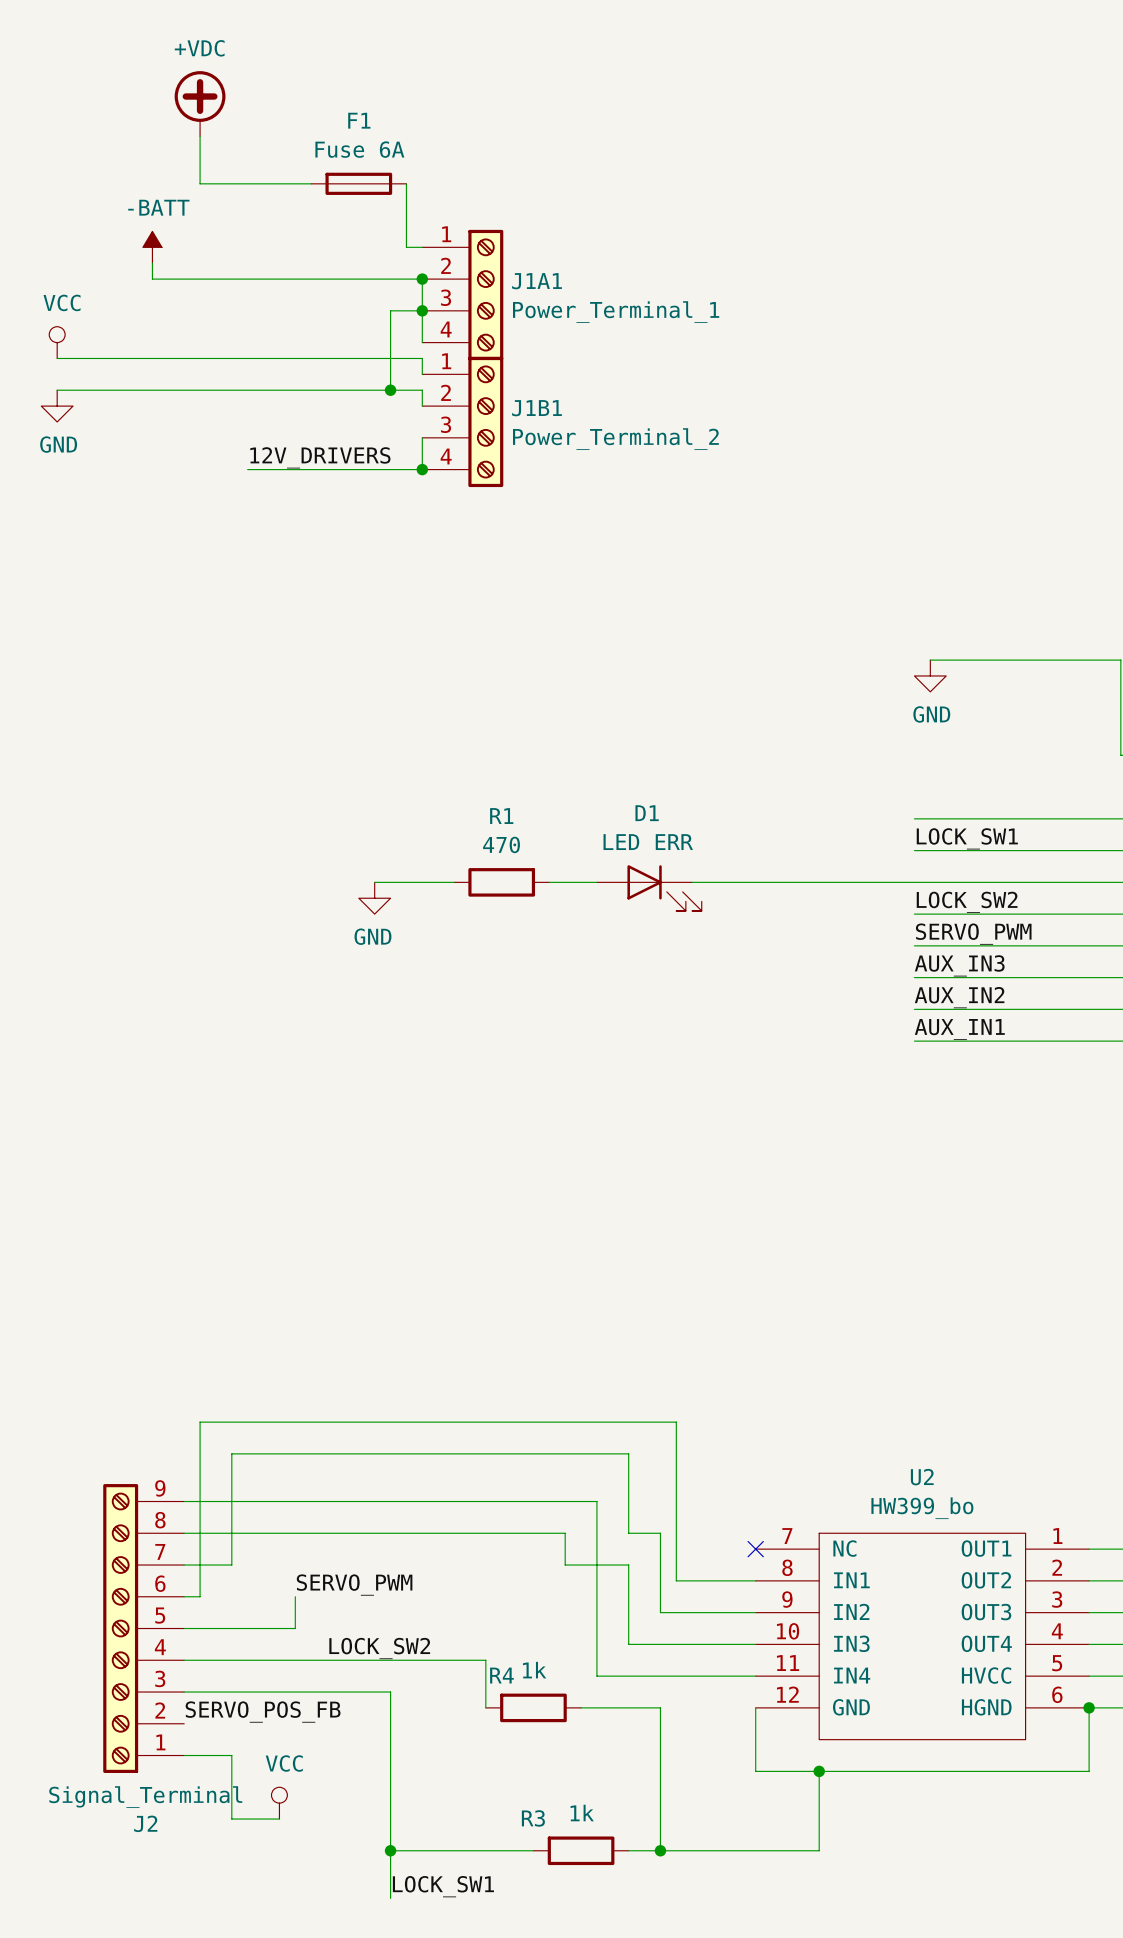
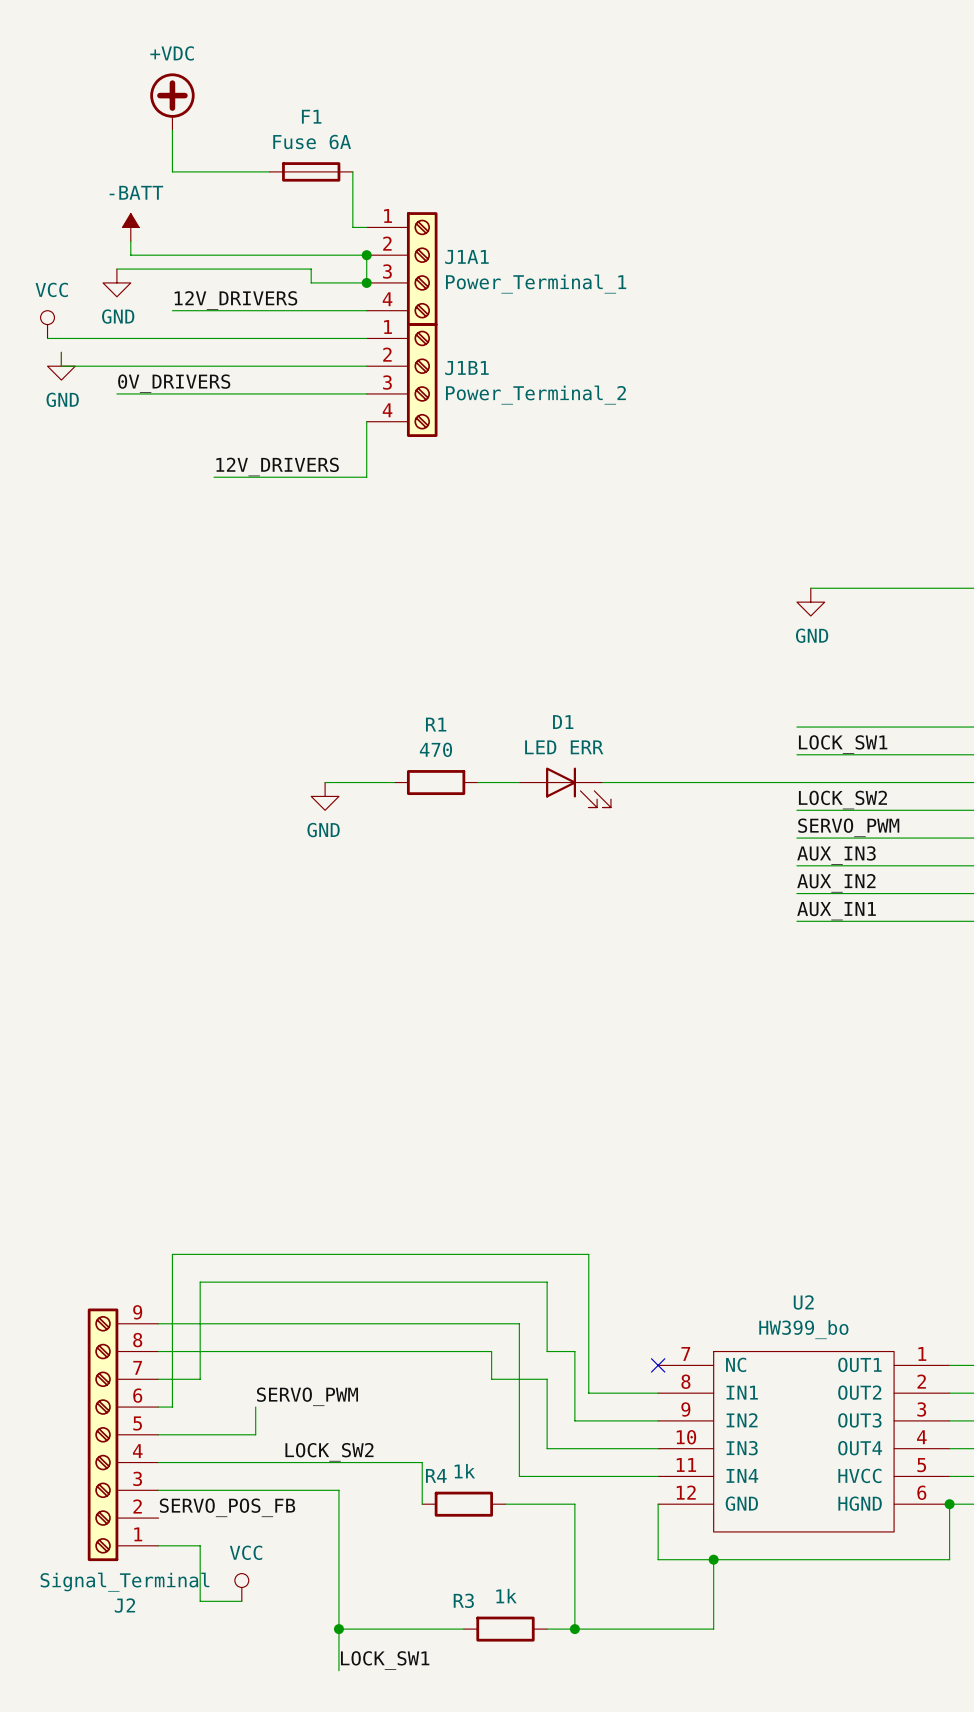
power symbol: none -> GND (116, 282)
wire: (390, 310) (390, 390) -> (338, 282) (311, 282) (311, 269) (116, 269)
wire: (422, 310) (422, 342) -> (172, 310) (366, 310)
label: none -> 12V_DRIVERS (235, 300)
power symbol position: VCC (57, 342) -> VCC (47, 324)
wire: (57, 358) (422, 358) (422, 374) -> (47, 338) (366, 338)
wire: (57, 390) (422, 390) (422, 406) -> (61, 352) (61, 366) (366, 366)
junction: (390, 390) -> none
power symbol position: GND (57, 406) -> GND (61, 366)
label: none -> 0V_DRIVERS (174, 383)
wire: (422, 437) (422, 469) (247, 469) -> (366, 393) (116, 393)
label position: 12V_DRIVERS (320, 457) -> 12V_DRIVERS (277, 466)
wire: none -> (366, 421) (366, 477) (214, 477)
junction: (422, 469) -> none

